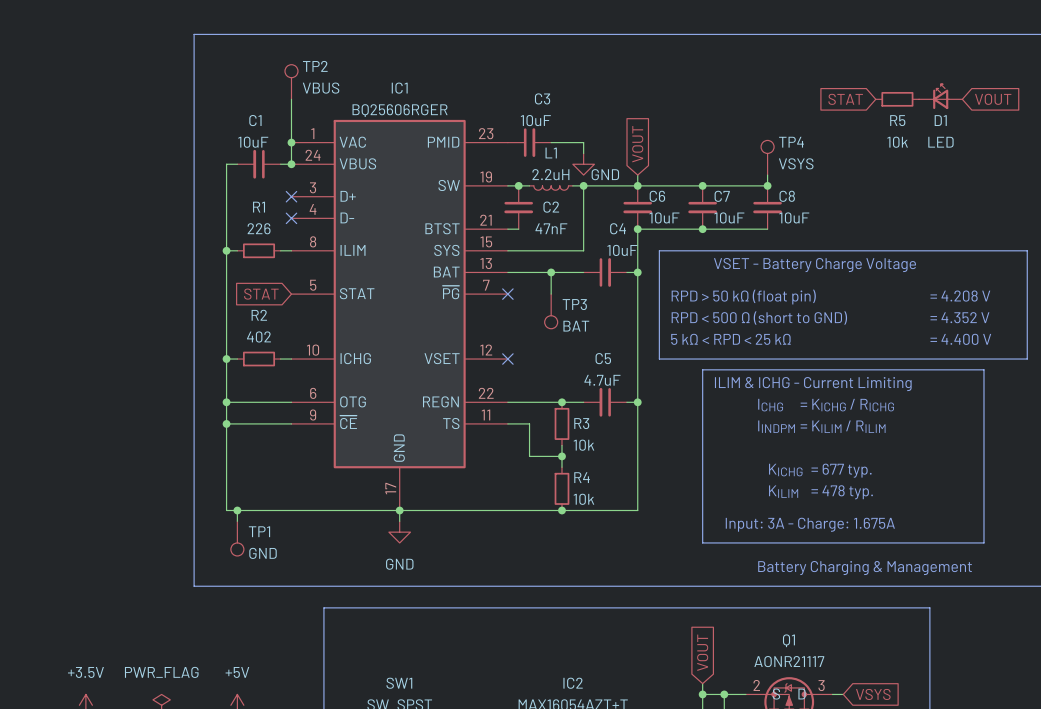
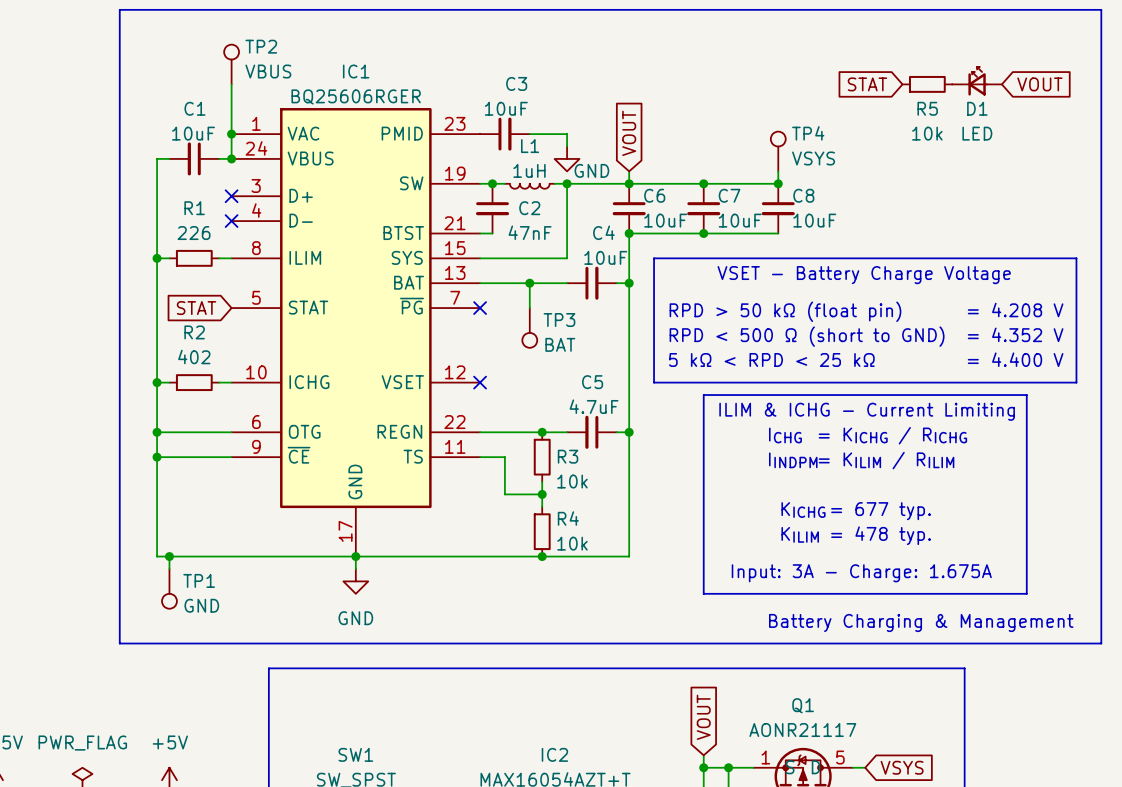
L1 value: 2.2uH (550, 174) -> 1uH (529, 170)
Q1 pin number: 2 (756, 685) -> 1 (765, 757)
Q1 pin number: 3 (821, 685) -> 5 (840, 757)

